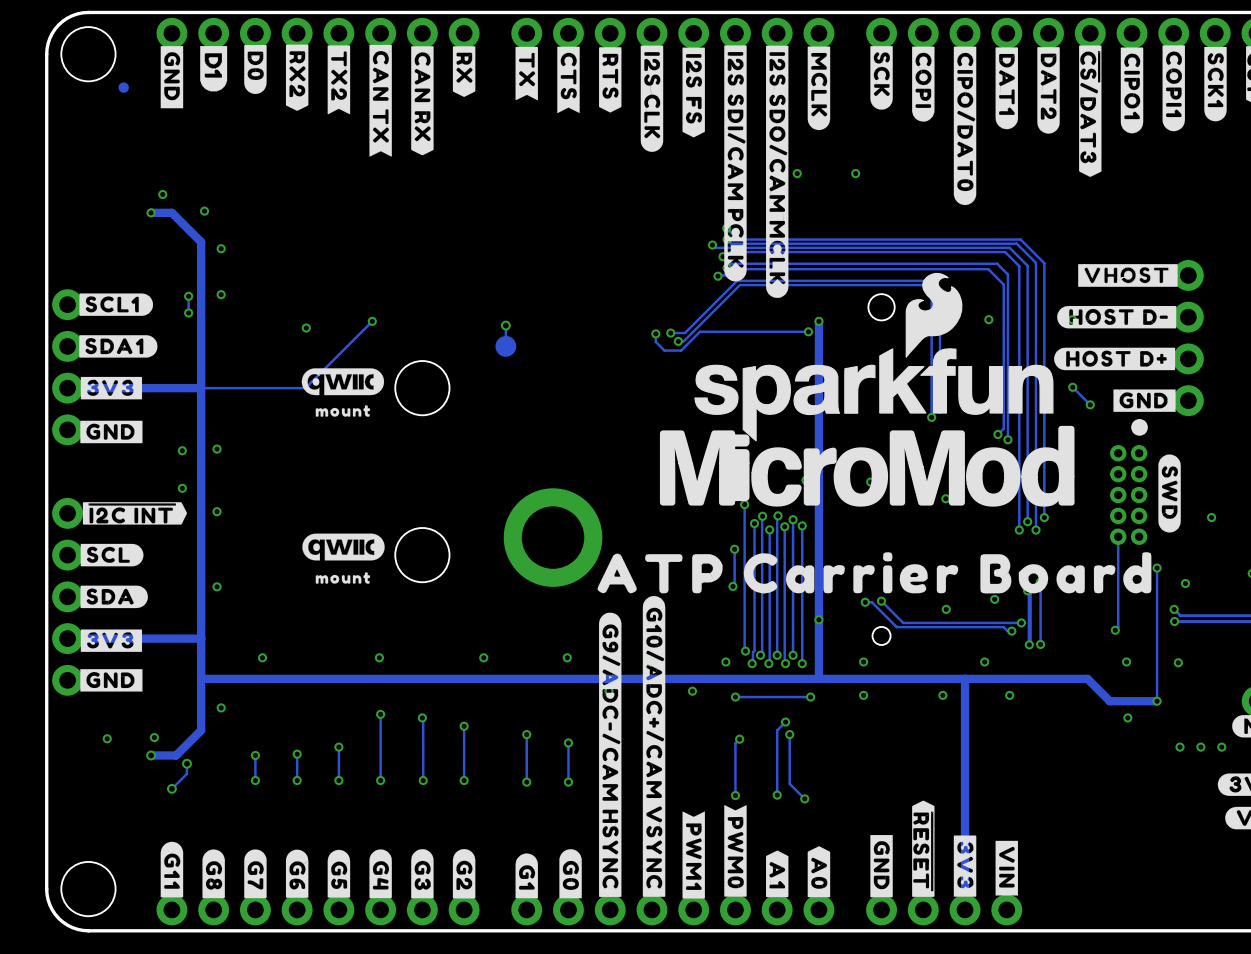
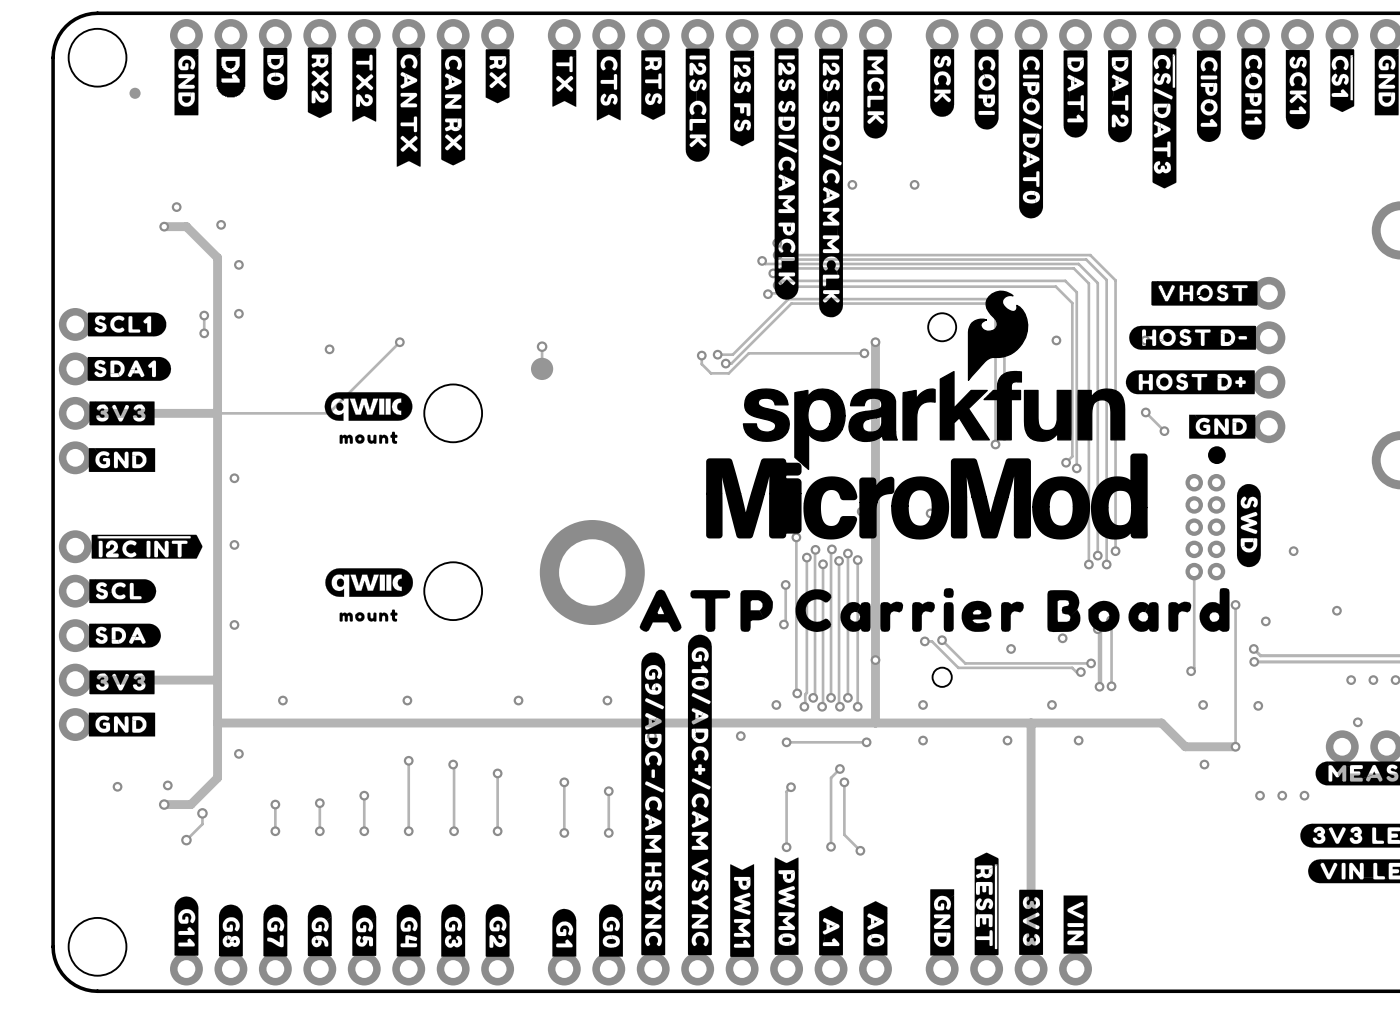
via: (182, 450) -> none
via: (182, 488) -> none
via: (945, 498) -> none

